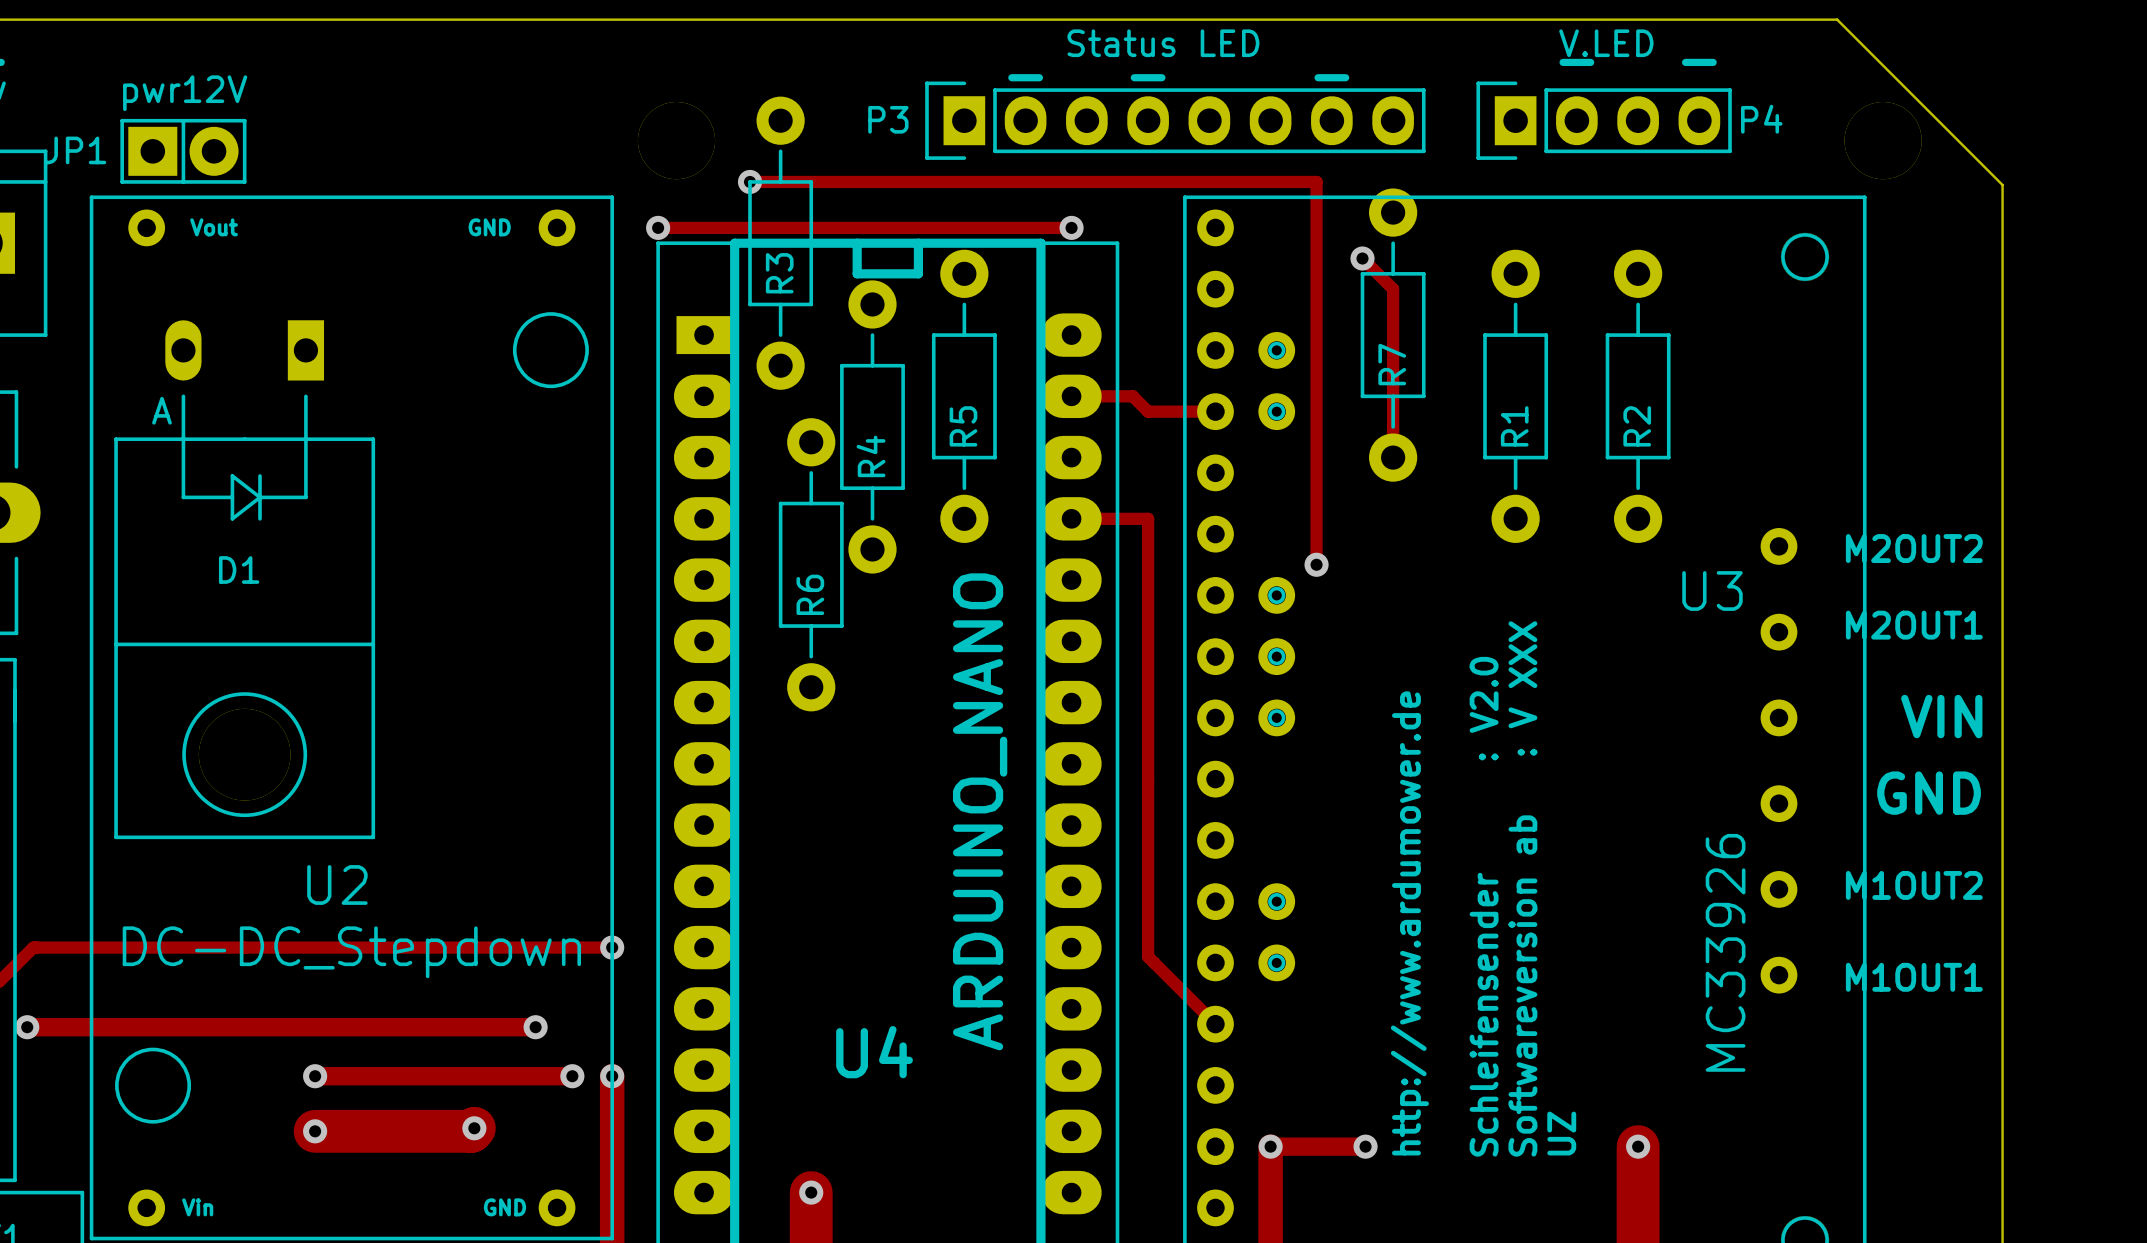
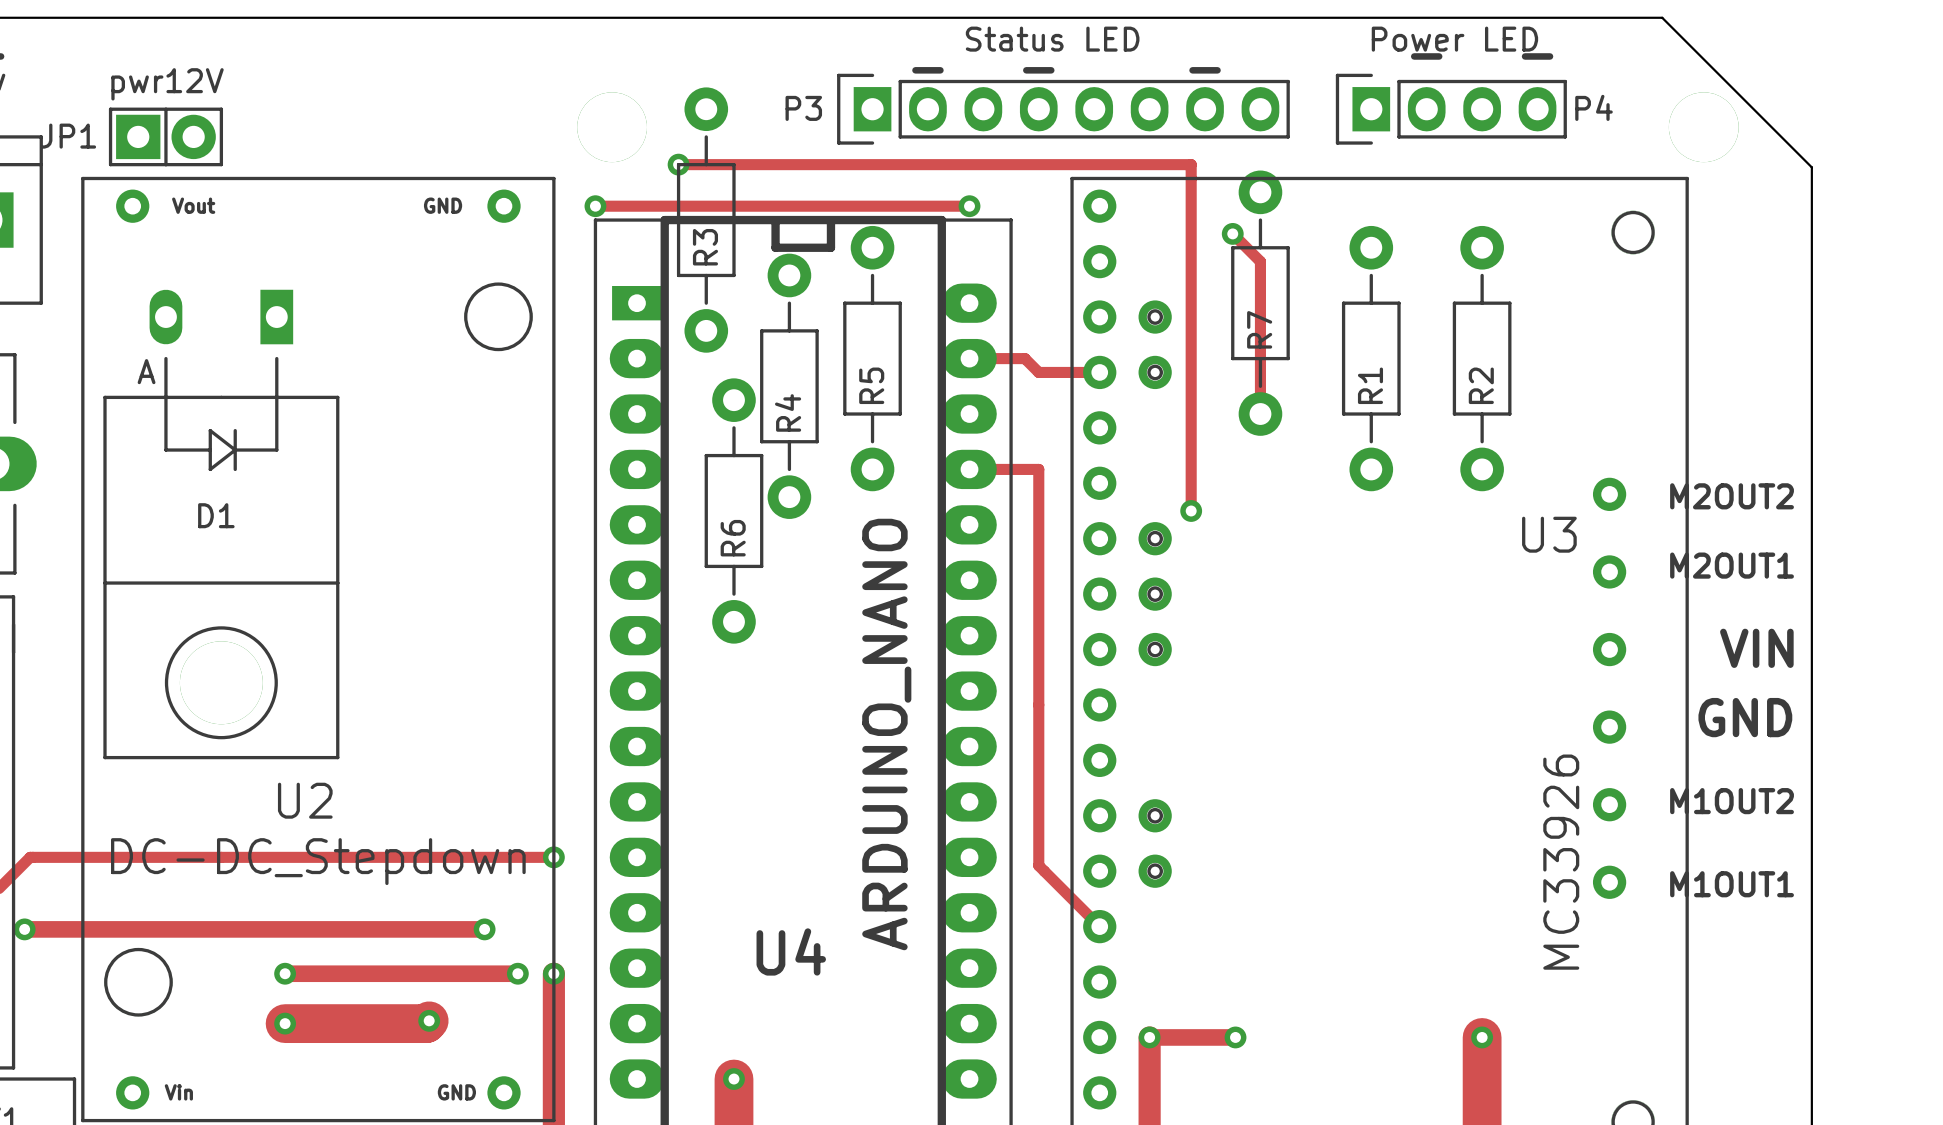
P4 value: V.LED (1606, 43) -> Power LED (1454, 39)
text: Softwareversion ab : V XXX (1522, 888) -> none
text: Schleifensender : V2.0 (1484, 906) -> none
text: http://www.ardumower.de (1409, 923) -> none
text: UZ (1561, 1133) -> none

